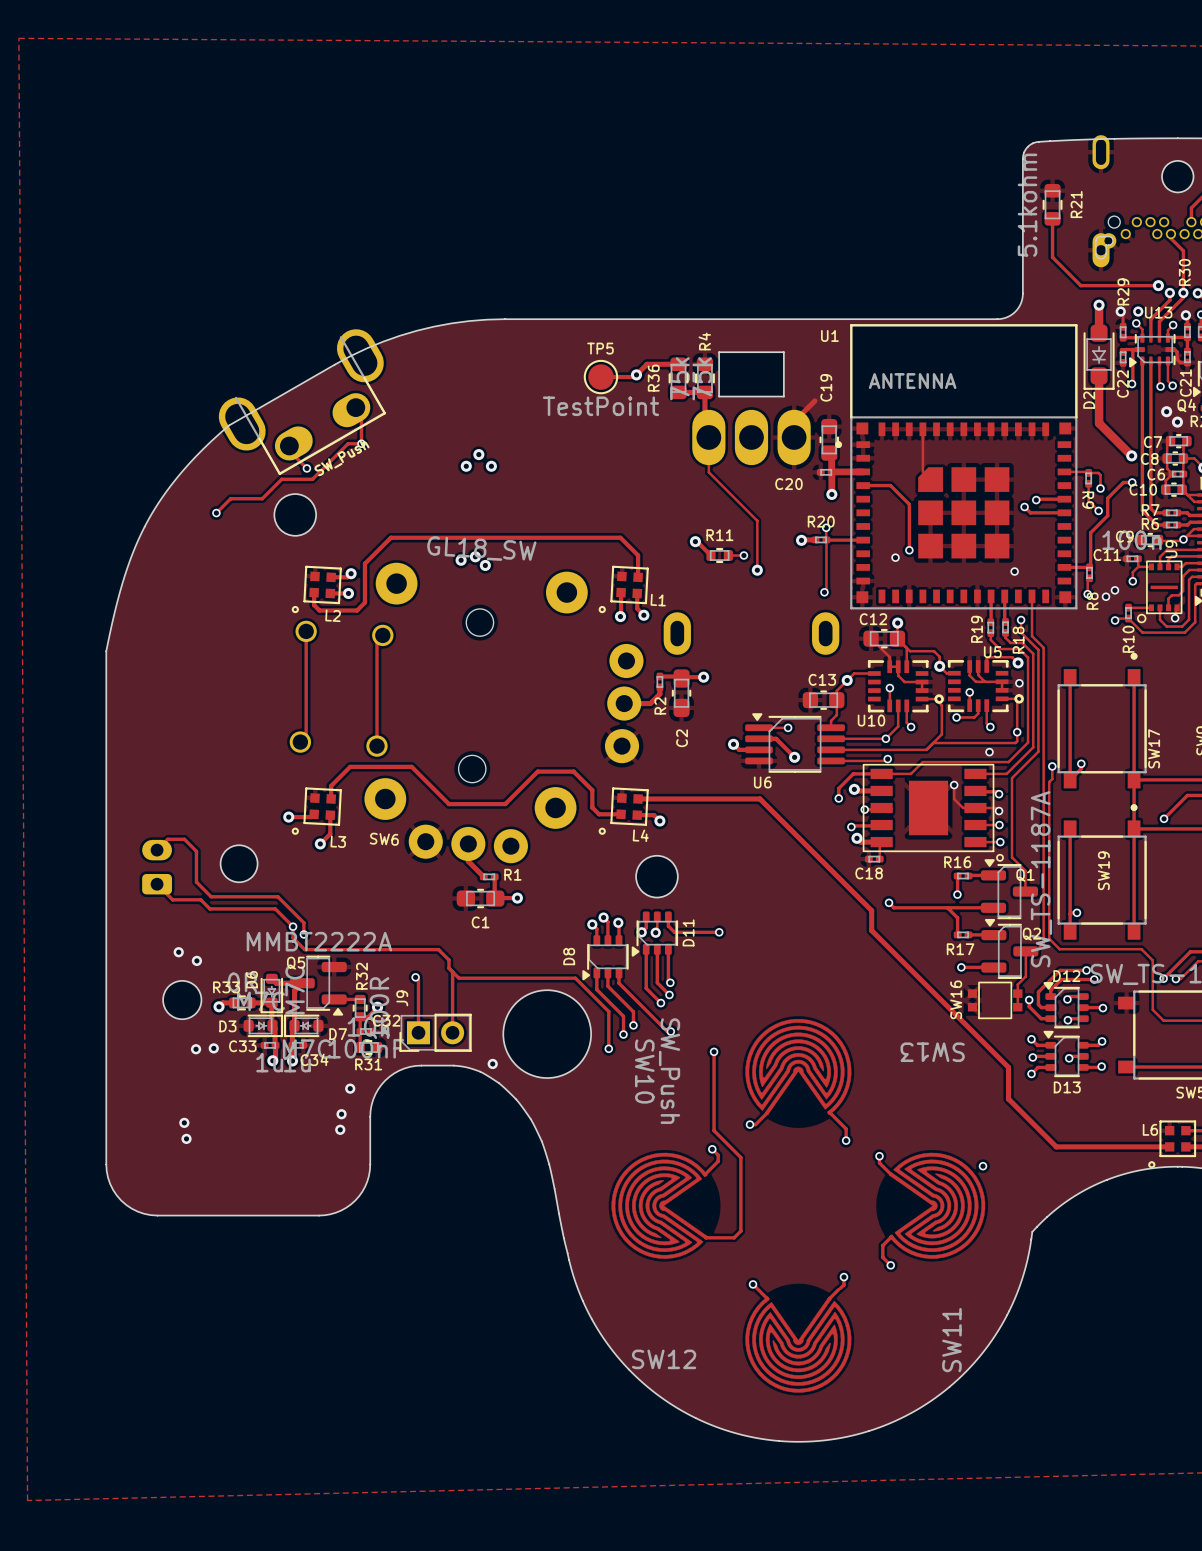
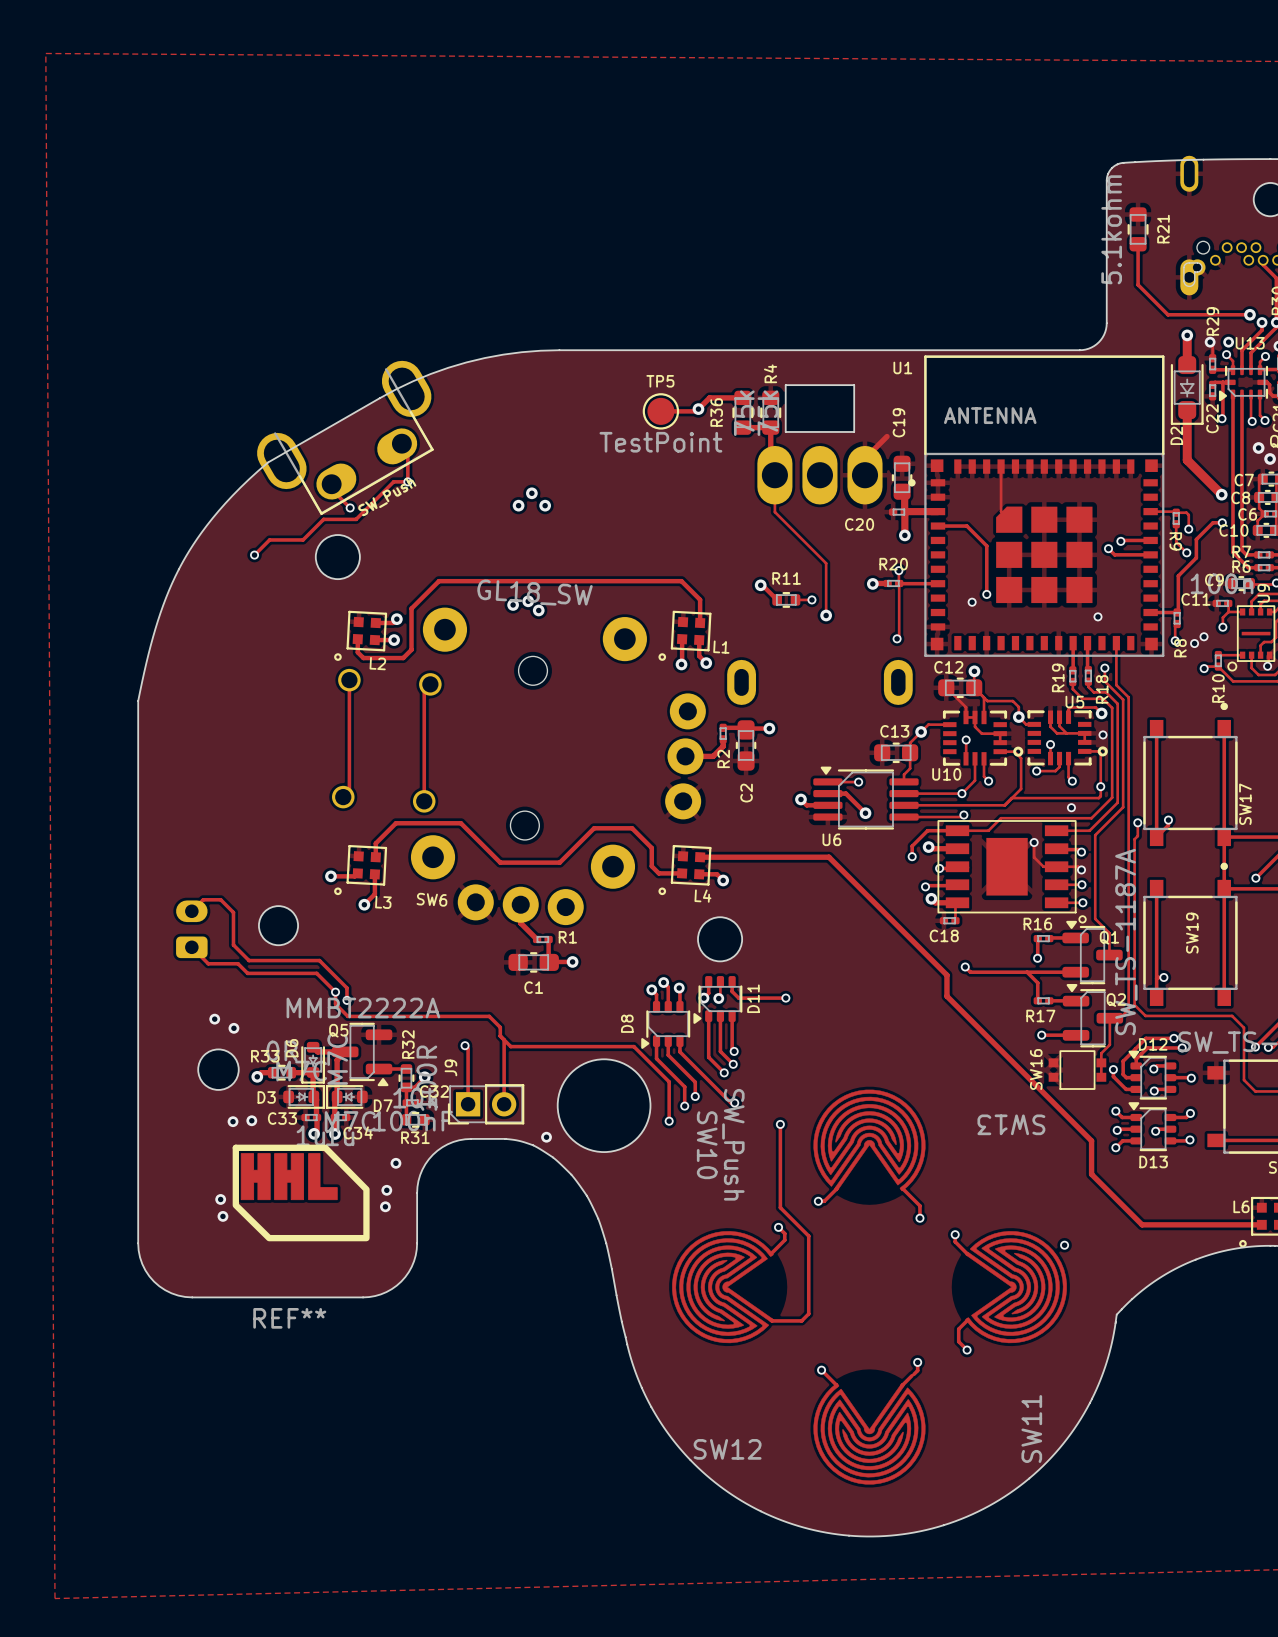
REF**: none -> (301, 1192)

